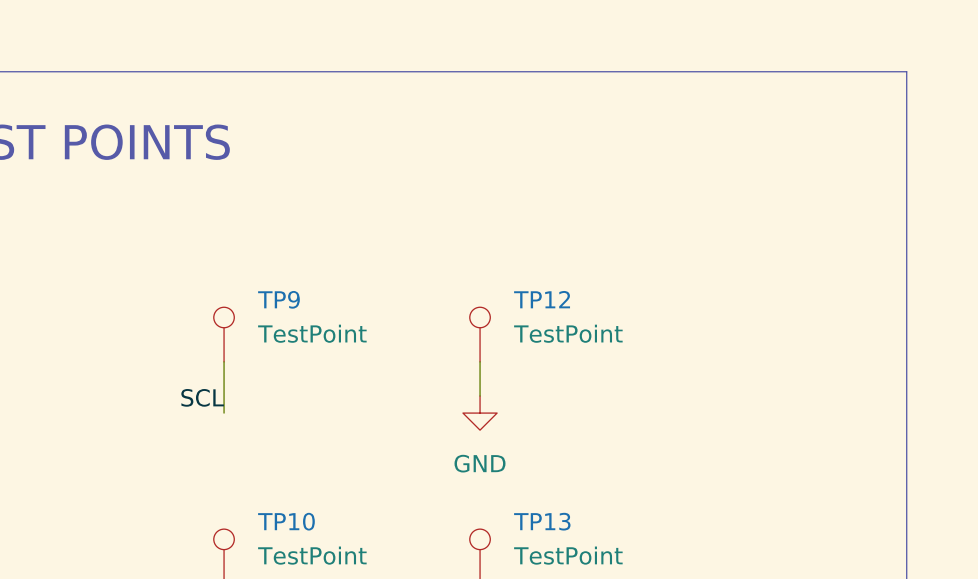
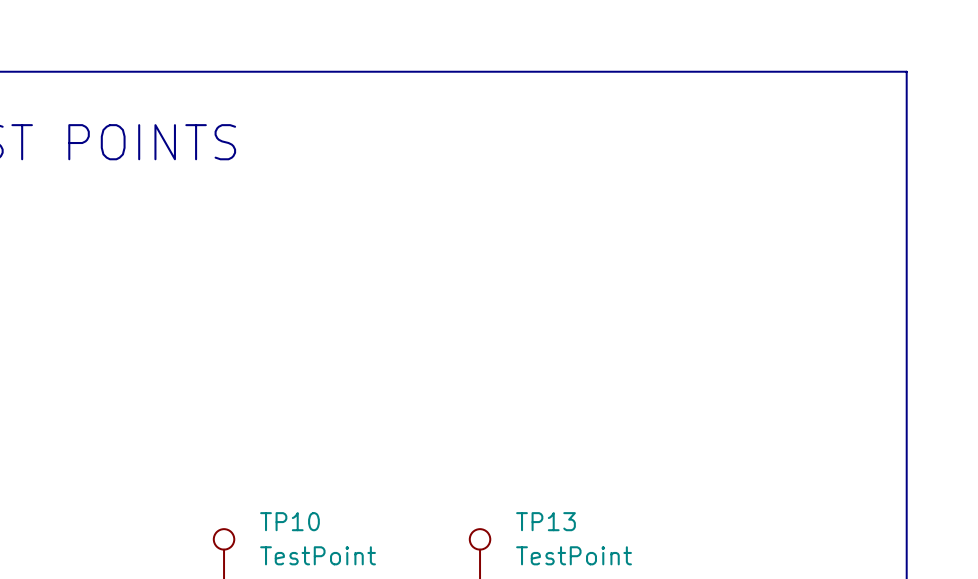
TP9: TestPoint (224, 334) -> none
TP12: TestPoint (480, 334) -> none
wire: (224, 361) (224, 413) -> none
wire: (480, 361) (480, 396) -> none
label: SCL (202, 397) -> none
power symbol: GND (480, 413) -> none

